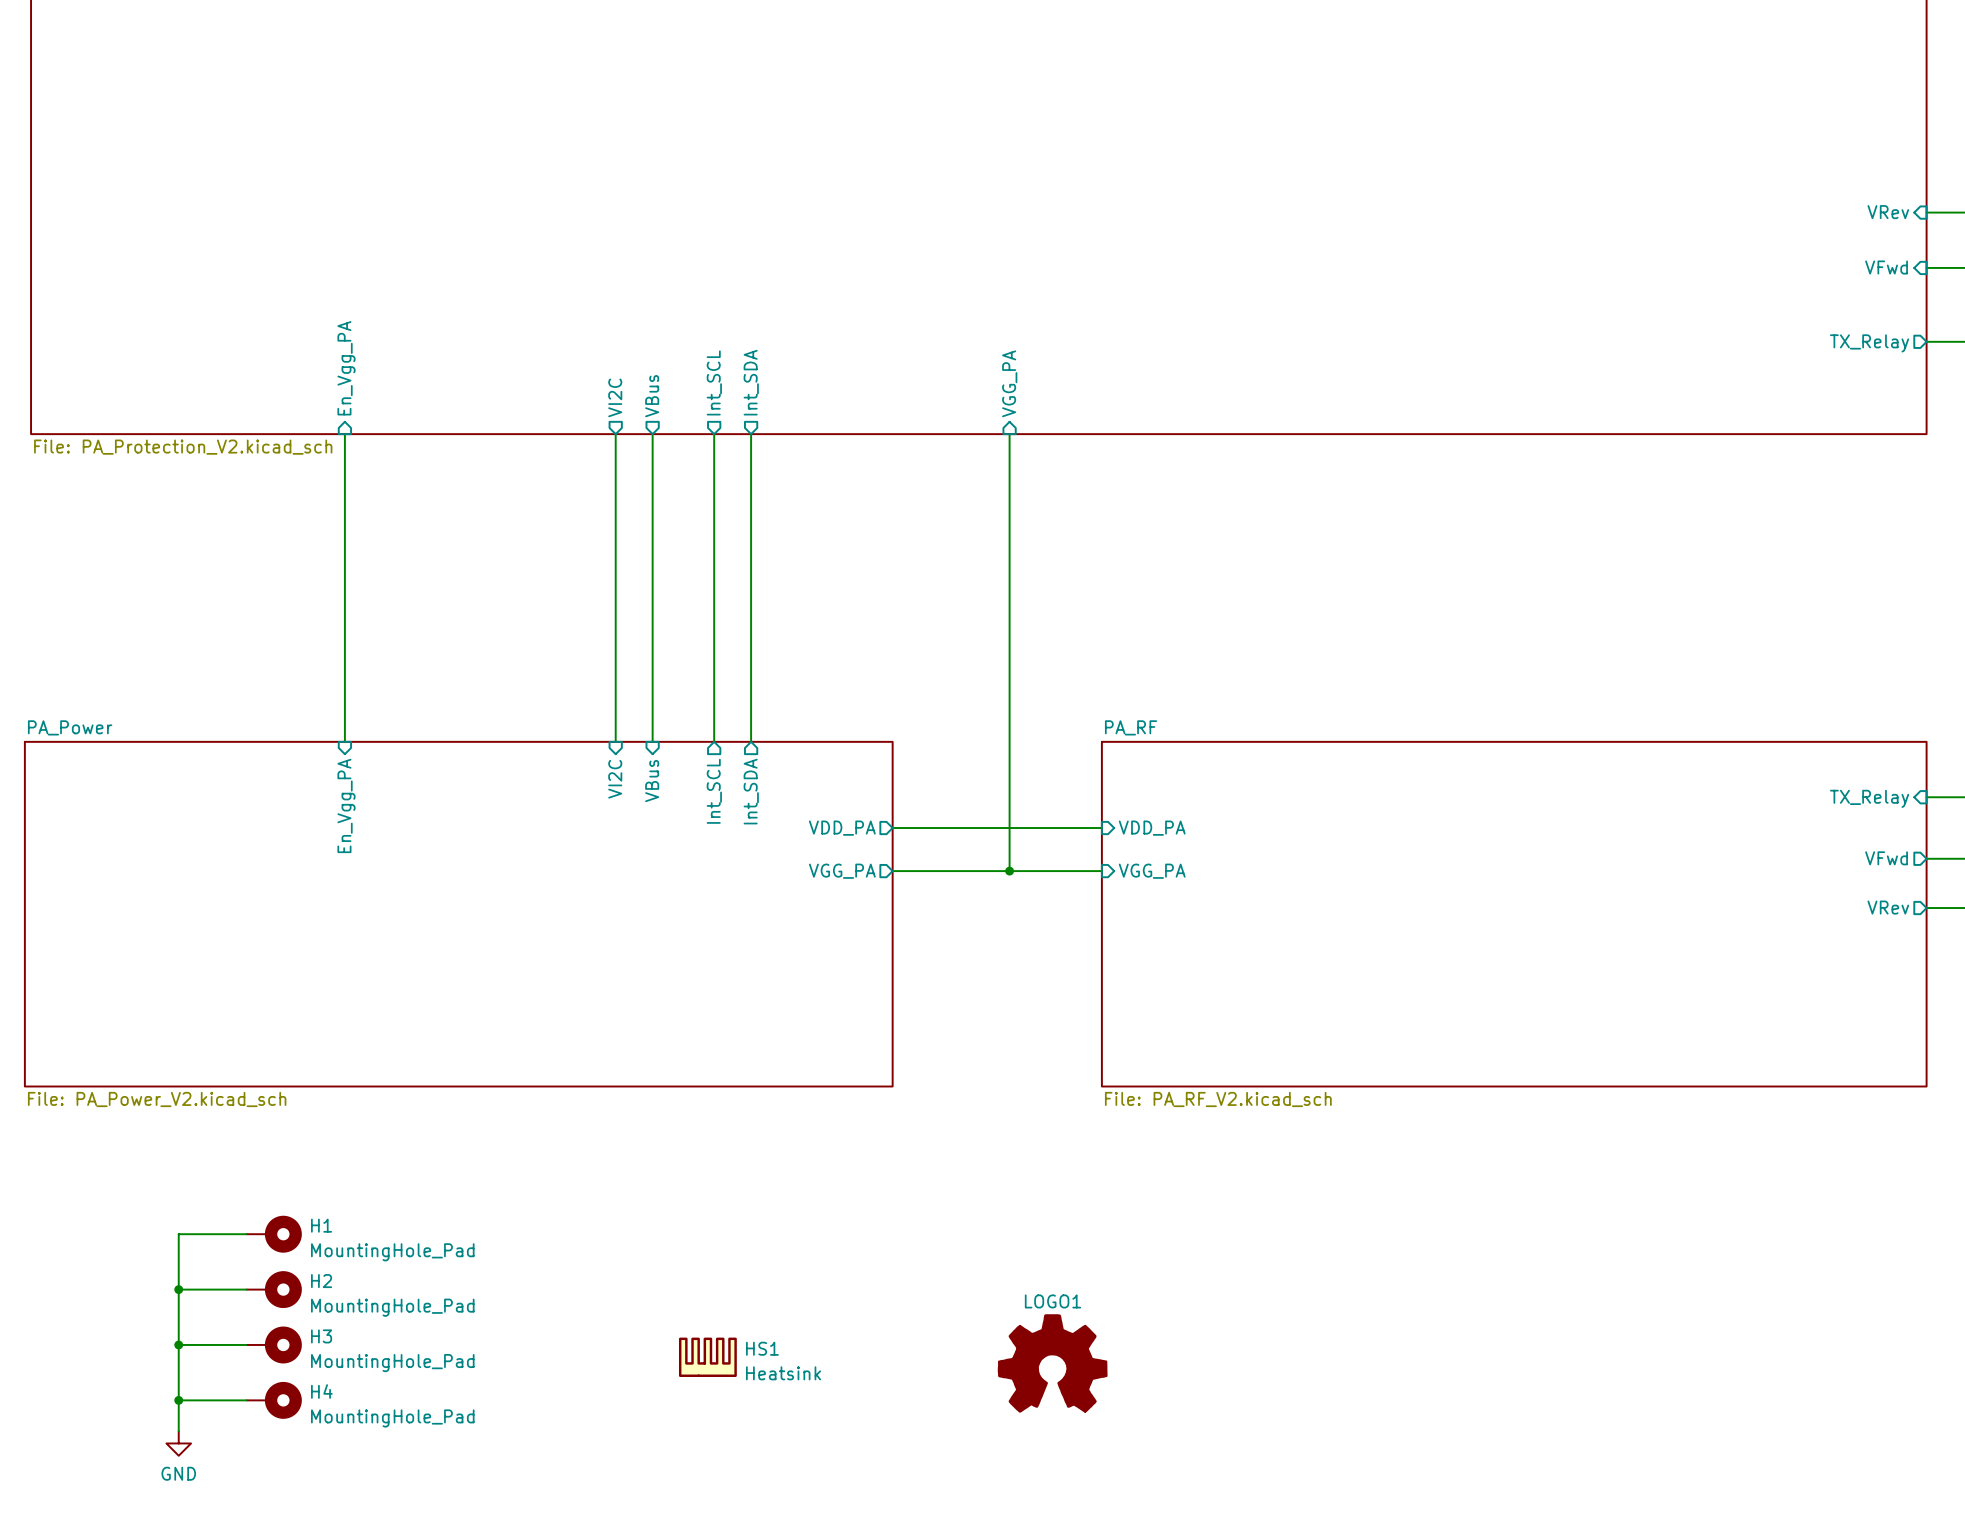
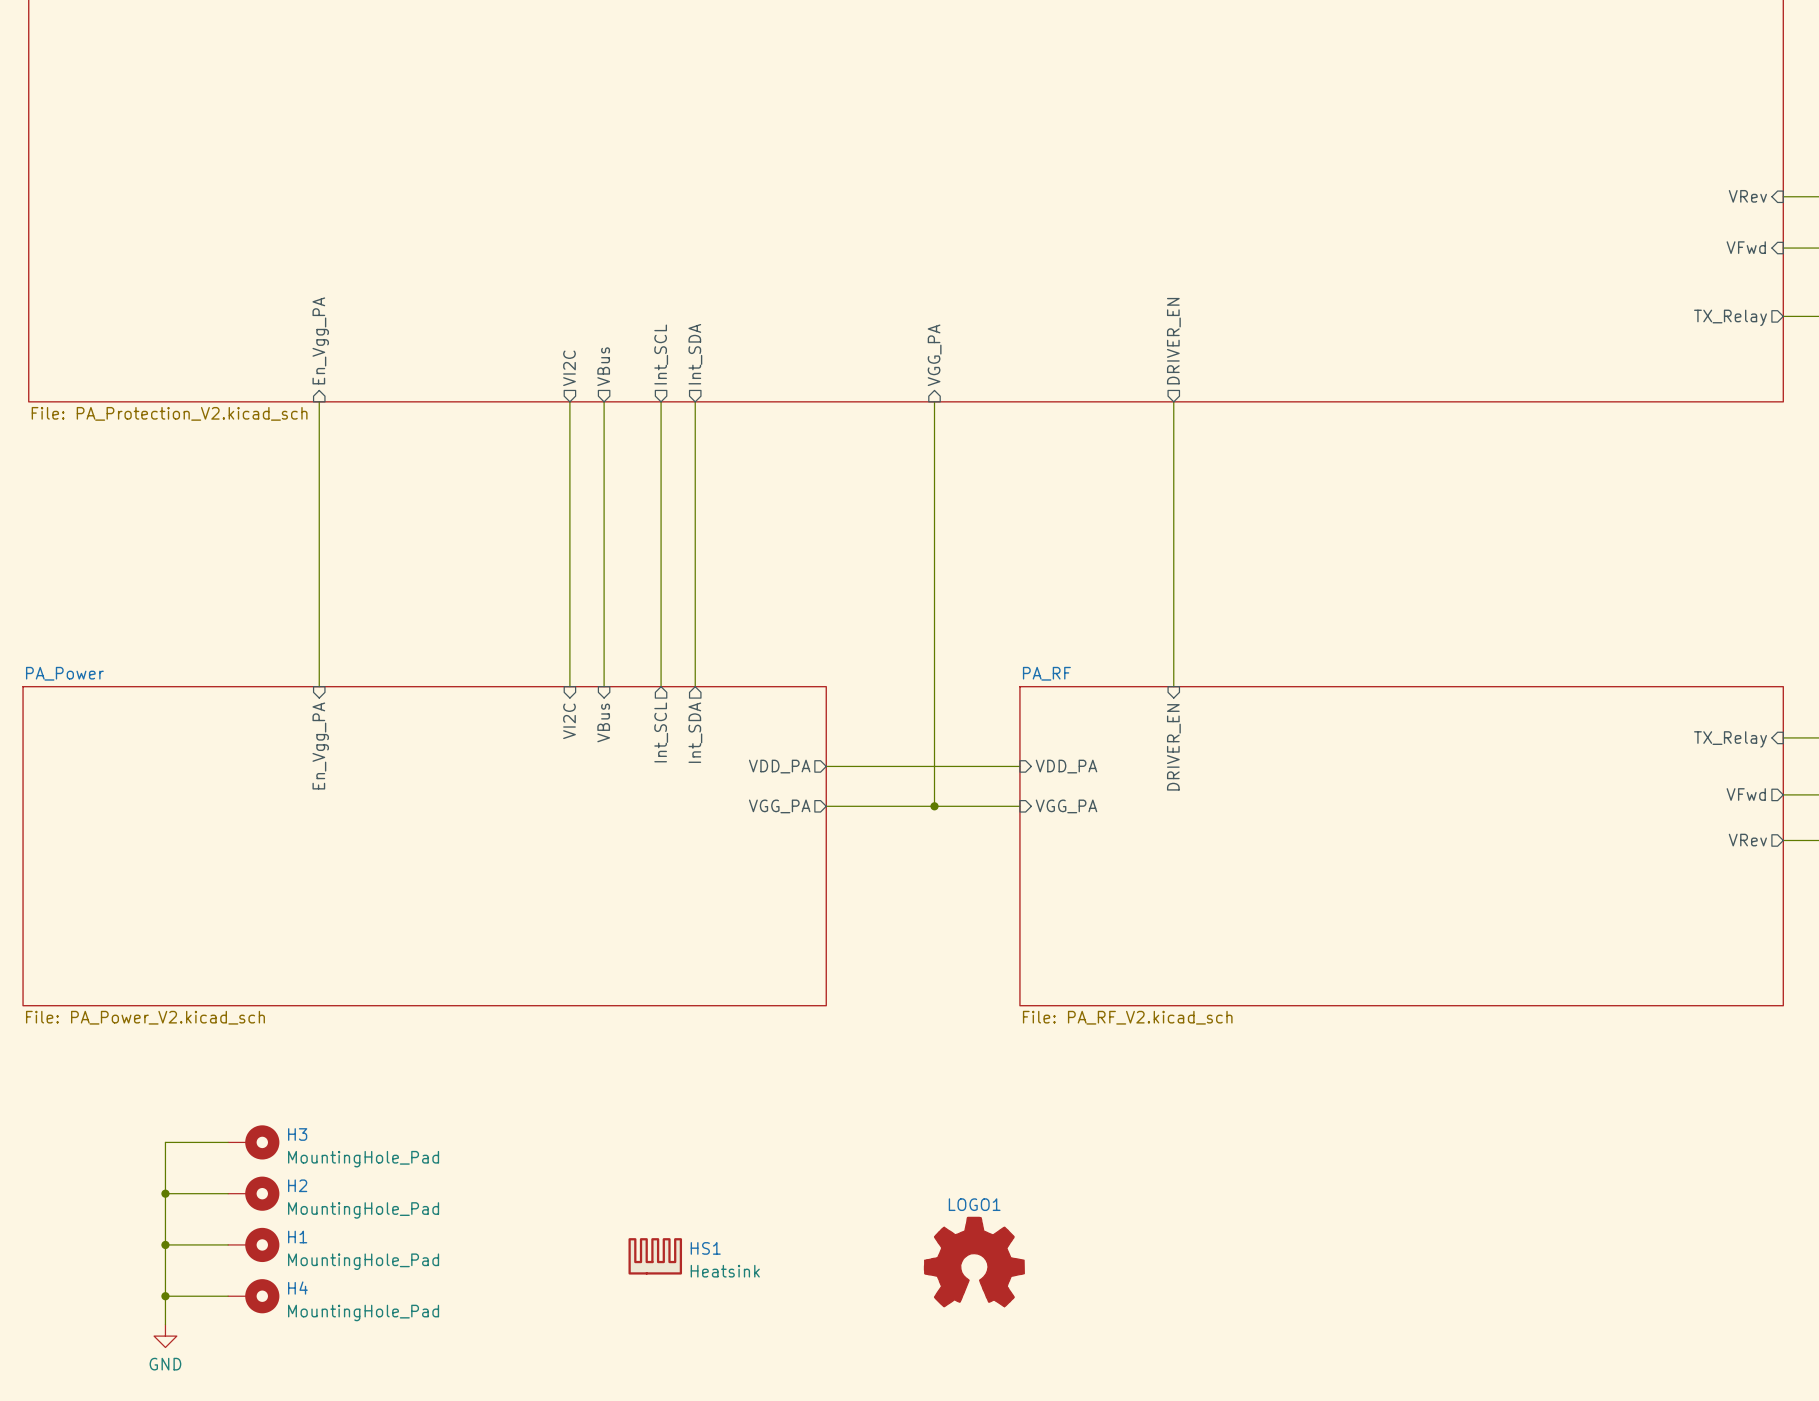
sheet pin: none -> DRIVER_EN (1173, 341)
wire: none -> (1173, 401) (1173, 686)
sheet pin: none -> DRIVER_EN (1173, 747)
H1 name: H1 (321, 1225) -> H3 (297, 1134)
H3 name: H3 (321, 1336) -> H1 (297, 1237)

